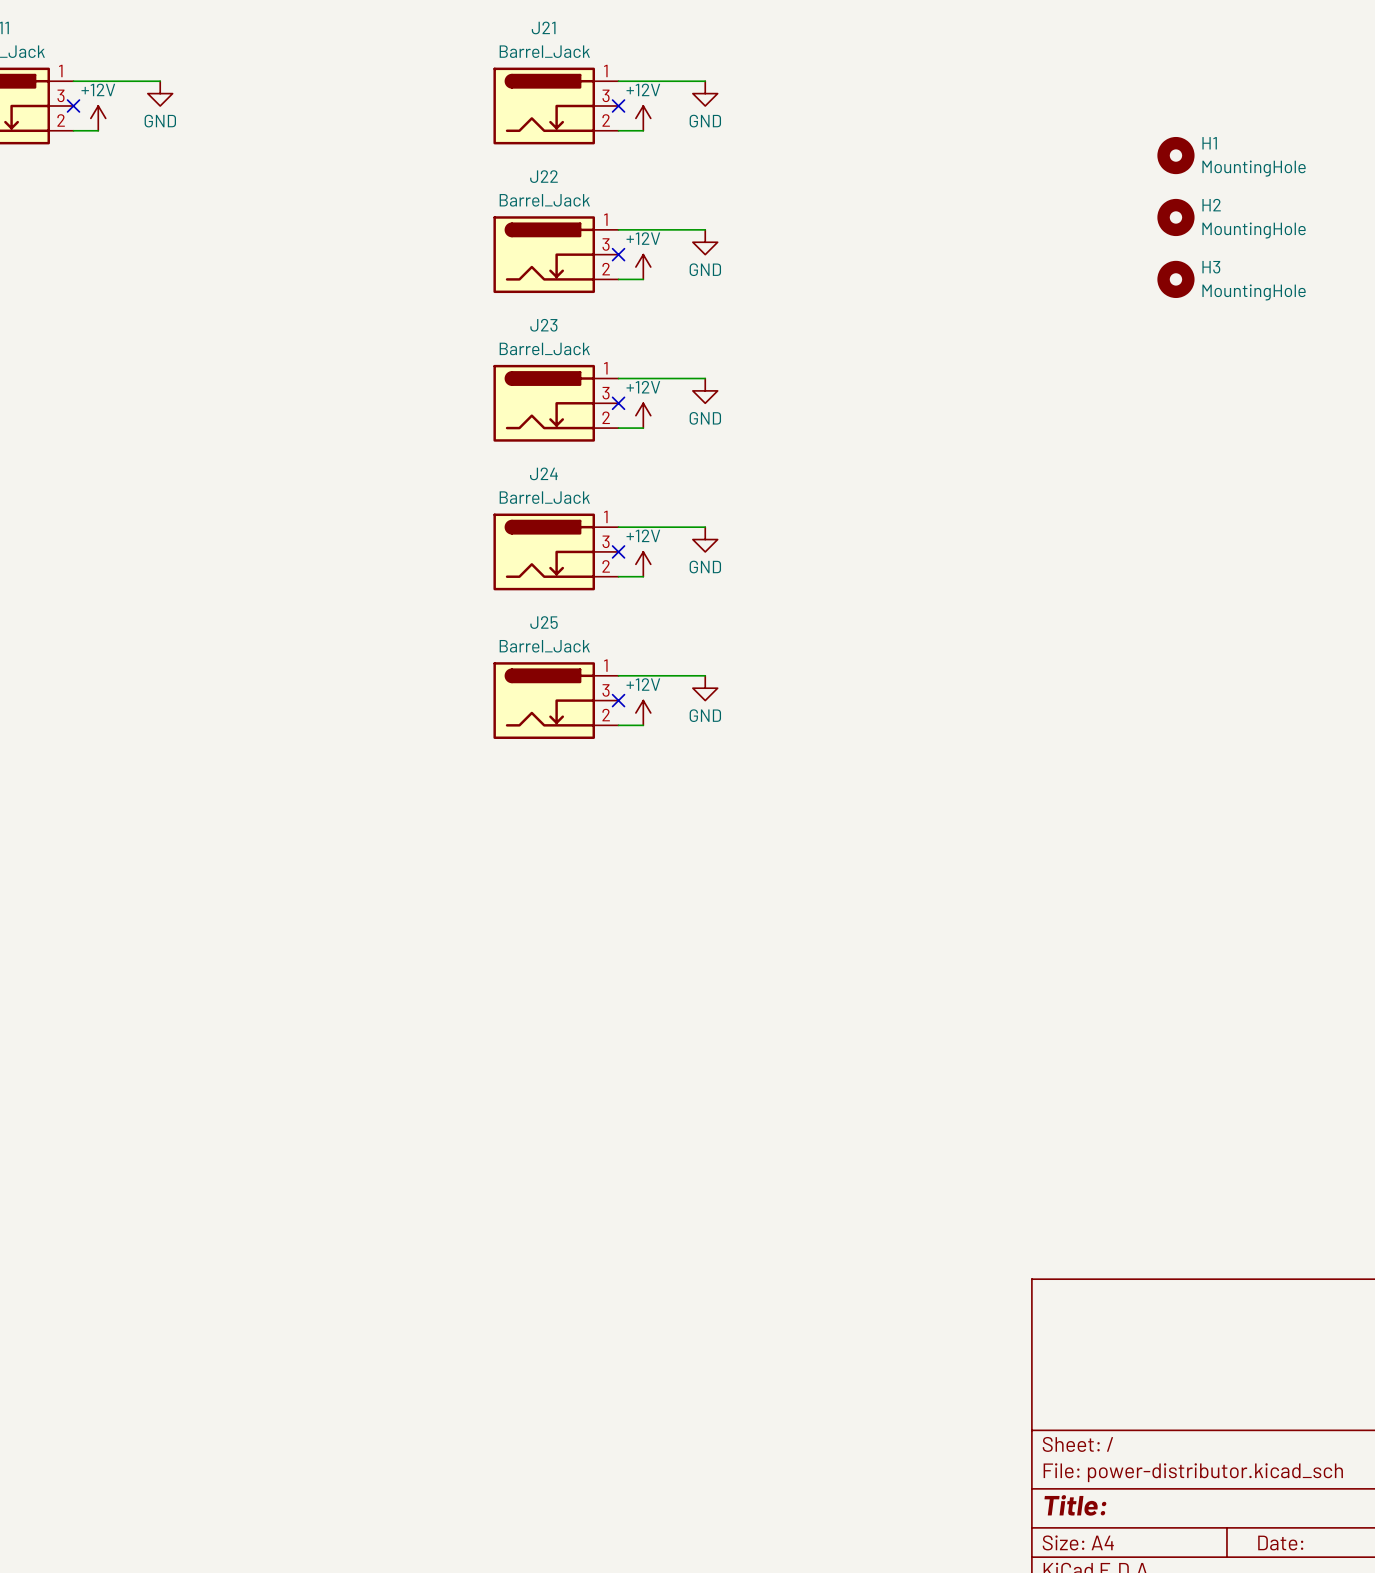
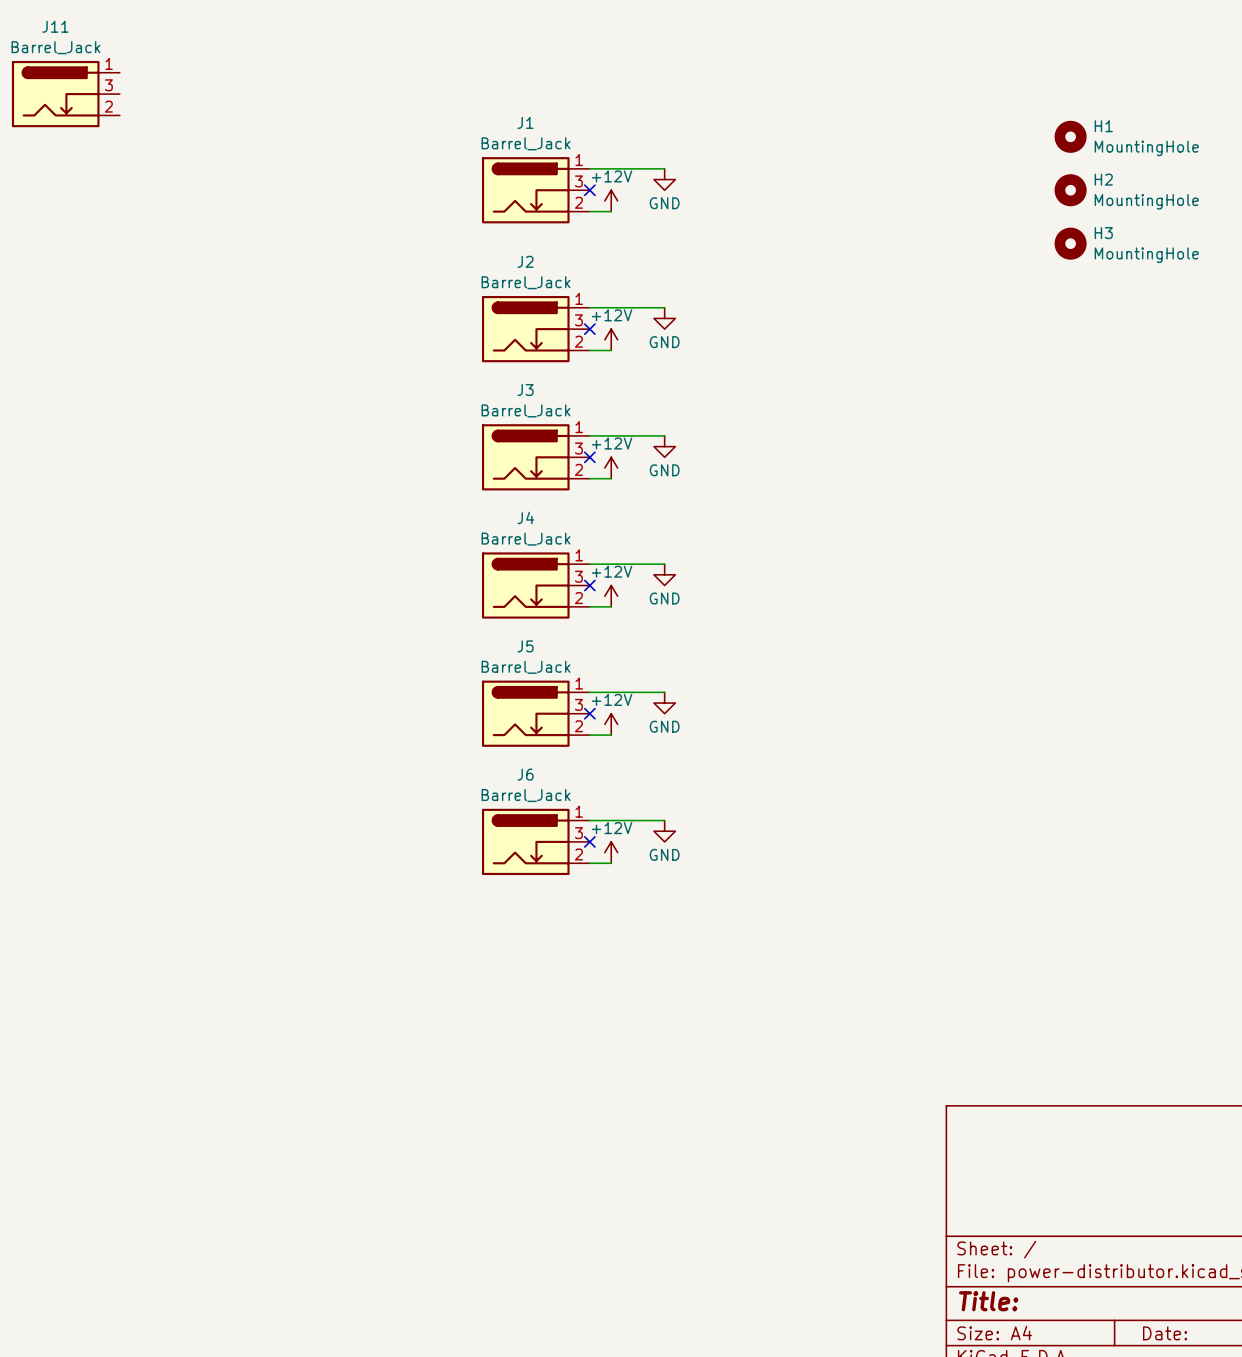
wire: (73, 81) (160, 81) -> none
wire: (618, 81) (705, 81) -> (589, 168) (664, 168)
power symbol: GND (160, 93) -> none
power symbol: GND (705, 93) -> none
no-connect mark: (73, 106) -> none
J21: Barrel_Jack (555, 106) -> none
no-connect mark: (618, 106) -> none
power symbol: +12V (98, 118) -> none
power symbol: +12V (643, 118) -> none
wire: (73, 130) (98, 130) -> none
wire: (618, 130) (643, 130) -> (589, 211) (611, 211)
J1: none -> Barrel_Jack (535, 190)
wire: (618, 229) (705, 229) -> (589, 307) (664, 307)
power symbol position: GND (705, 242) -> GND (664, 179)
J22: Barrel_Jack (555, 254) -> none
no-connect mark position: (618, 254) -> (589, 190)
power symbol position: +12V (643, 267) -> +12V (611, 200)
wire: (618, 279) (643, 279) -> (589, 350) (611, 350)
J2: none -> Barrel_Jack (535, 329)
wire: (618, 378) (705, 378) -> (589, 435) (664, 435)
power symbol position: GND (705, 390) -> GND (664, 318)
J23: Barrel_Jack (555, 403) -> none
no-connect mark position: (618, 403) -> (589, 329)
power symbol position: +12V (643, 415) -> +12V (611, 339)
wire: (618, 428) (643, 428) -> (589, 478) (611, 478)
J3: none -> Barrel_Jack (535, 457)
wire: (618, 527) (705, 527) -> (589, 564) (664, 564)
power symbol position: GND (705, 539) -> GND (664, 446)
J24: Barrel_Jack (555, 551) -> none
no-connect mark position: (618, 551) -> (589, 457)
power symbol position: +12V (643, 564) -> +12V (611, 468)
wire: (618, 576) (643, 576) -> (589, 606) (611, 606)
J4: none -> Barrel_Jack (535, 585)
wire: (618, 675) (705, 675) -> (589, 692) (664, 692)
power symbol position: GND (705, 688) -> GND (664, 574)
J25: Barrel_Jack (555, 700) -> none
no-connect mark position: (618, 700) -> (589, 585)
power symbol position: +12V (643, 712) -> +12V (611, 596)
wire: (618, 725) (643, 725) -> (589, 735) (611, 735)
power symbol: none -> GND (664, 703)
J5: none -> Barrel_Jack (535, 713)
no-connect mark: none -> (589, 713)
power symbol: none -> +12V (611, 724)
wire: none -> (589, 820) (664, 820)
power symbol: none -> GND (664, 831)
J6: none -> Barrel_Jack (535, 841)
no-connect mark: none -> (589, 841)
power symbol: none -> +12V (611, 852)
wire: none -> (589, 863) (611, 863)

